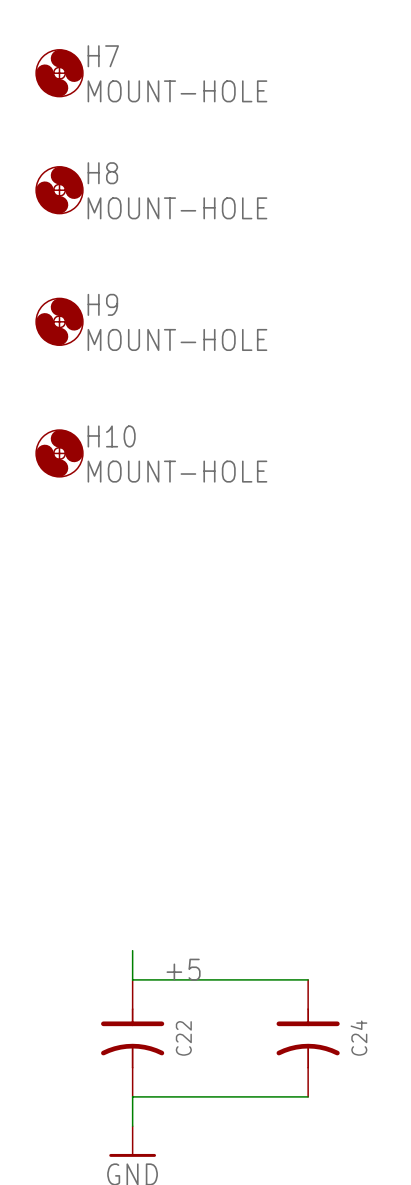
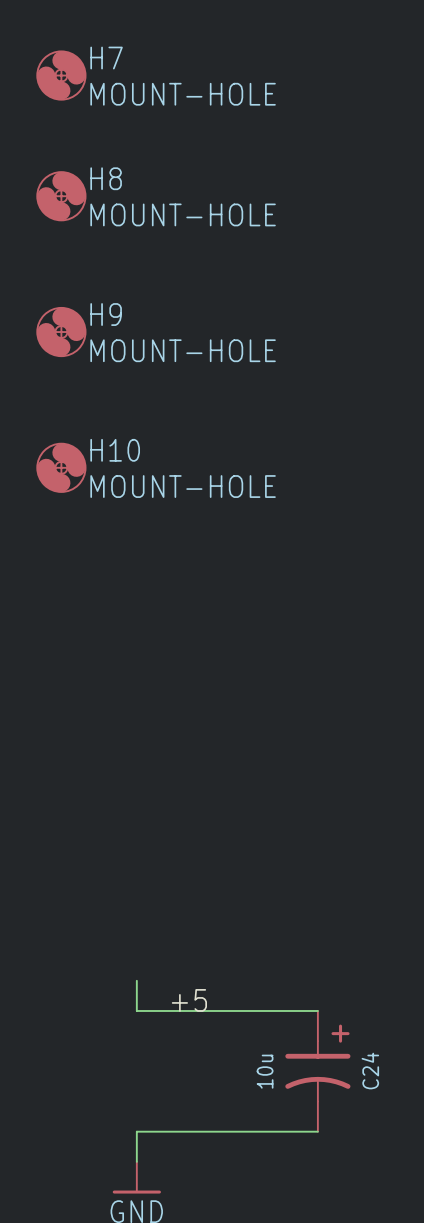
C24 symbol: [276, 979, 340, 1097] -> [285, 1010, 351, 1132]
C22: (132, 1038) -> none
C24 value: none -> 10u (265, 1071)

